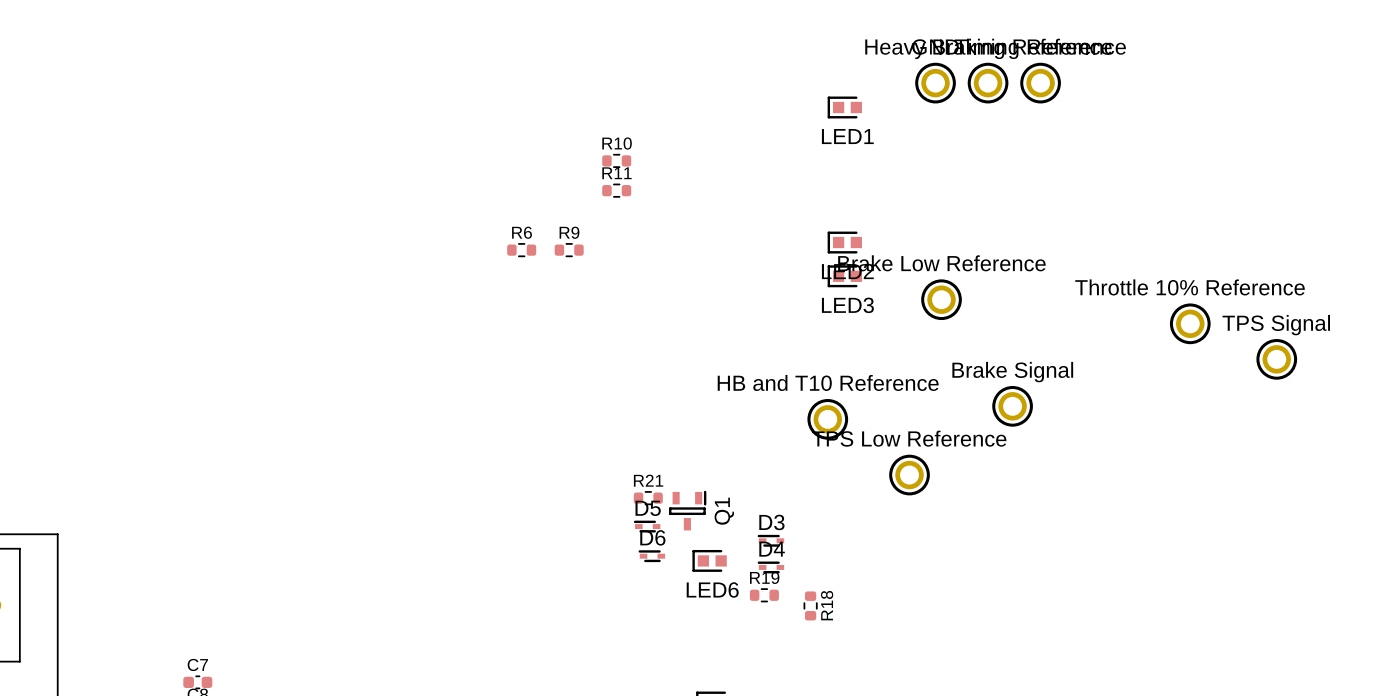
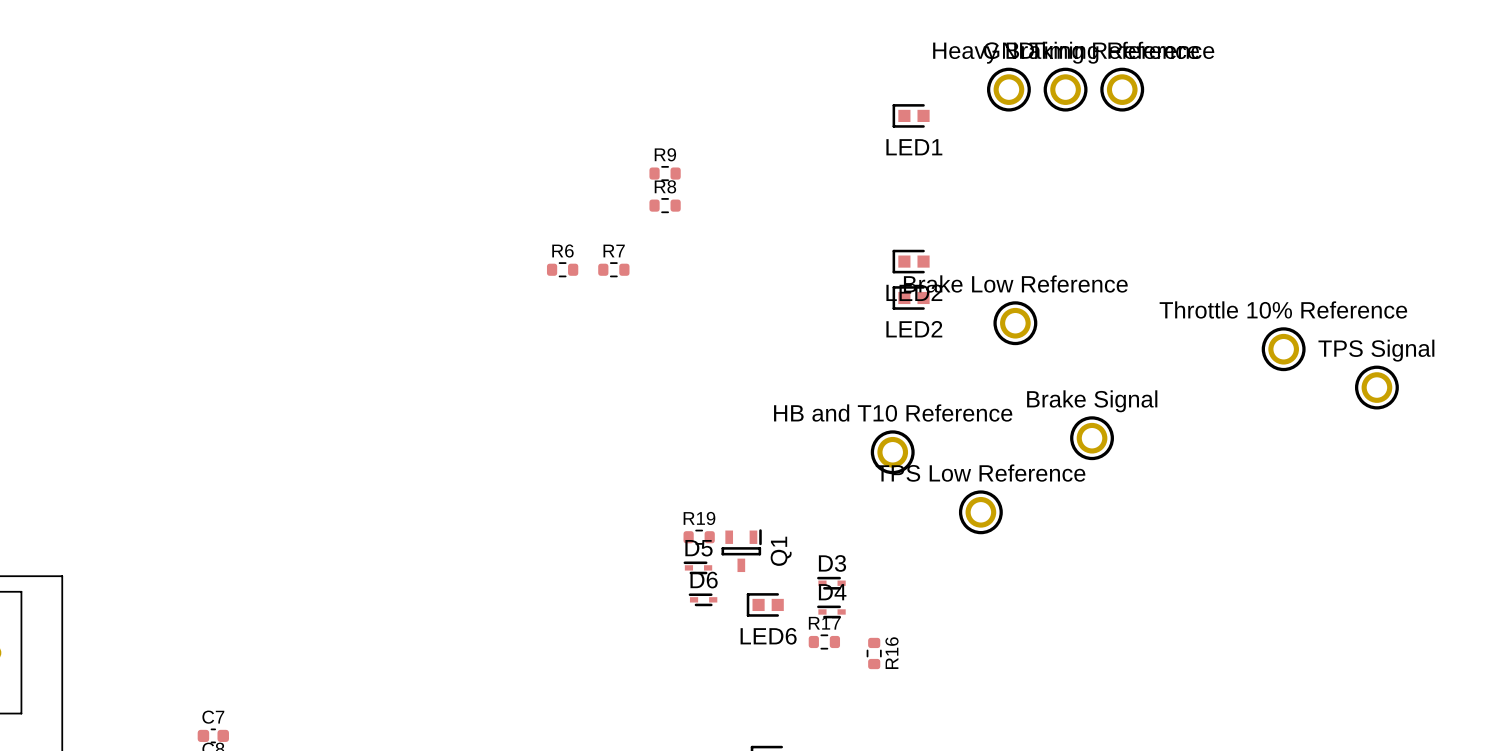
R10 name: R10 (617, 143) -> R9 (665, 154)
R11 name: R11 (616, 173) -> R8 (665, 186)
R9 name: R9 (569, 232) -> R7 (614, 251)
LED3 name: LED3 (847, 305) -> LED2 (914, 329)
R21 name: R21 (648, 480) -> R19 (699, 518)
R19 name: R19 (764, 577) -> R17 (824, 623)
R18 name: R18 (827, 605) -> R16 (891, 653)

